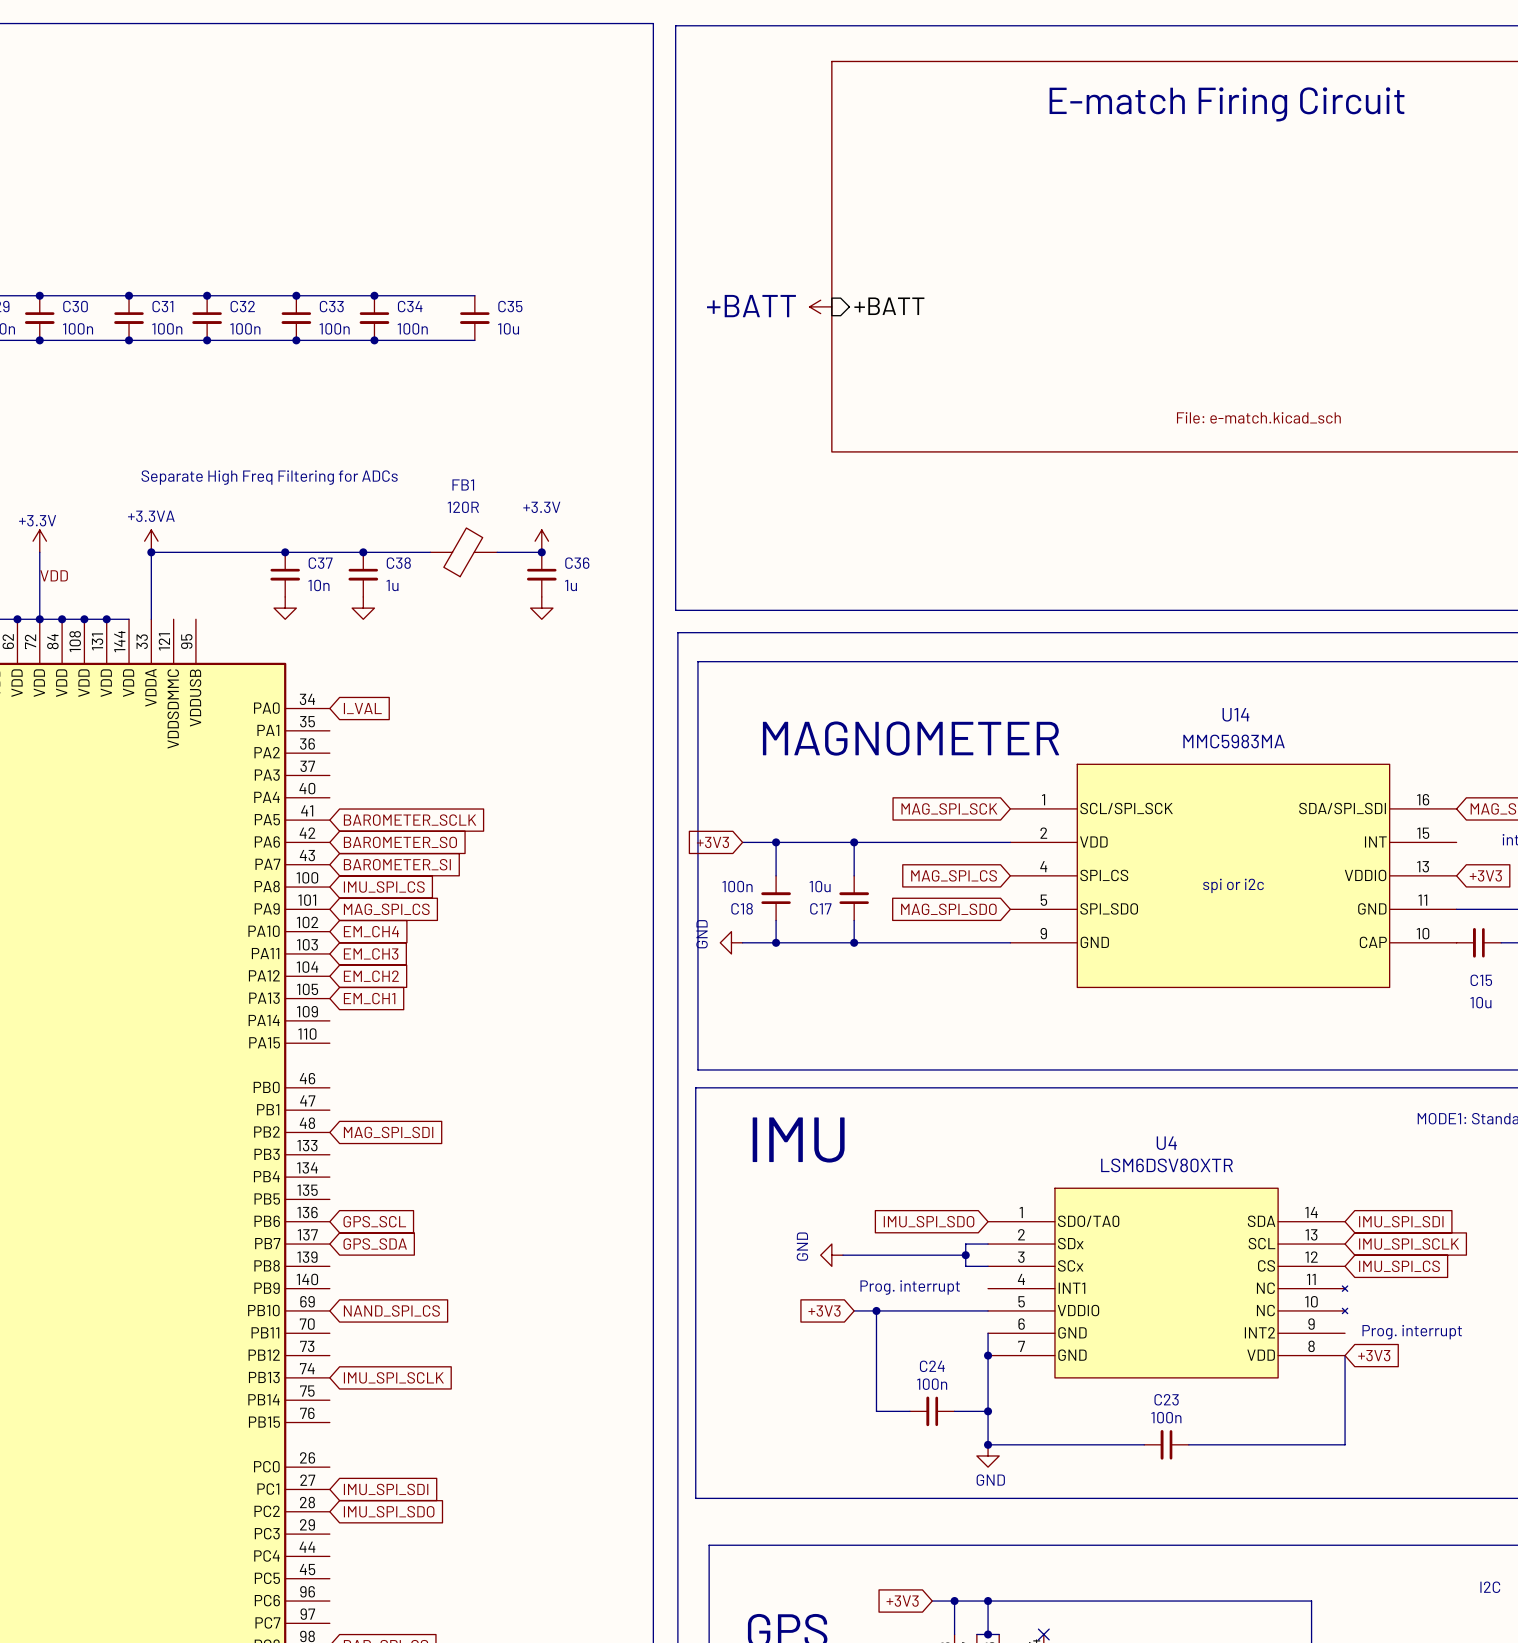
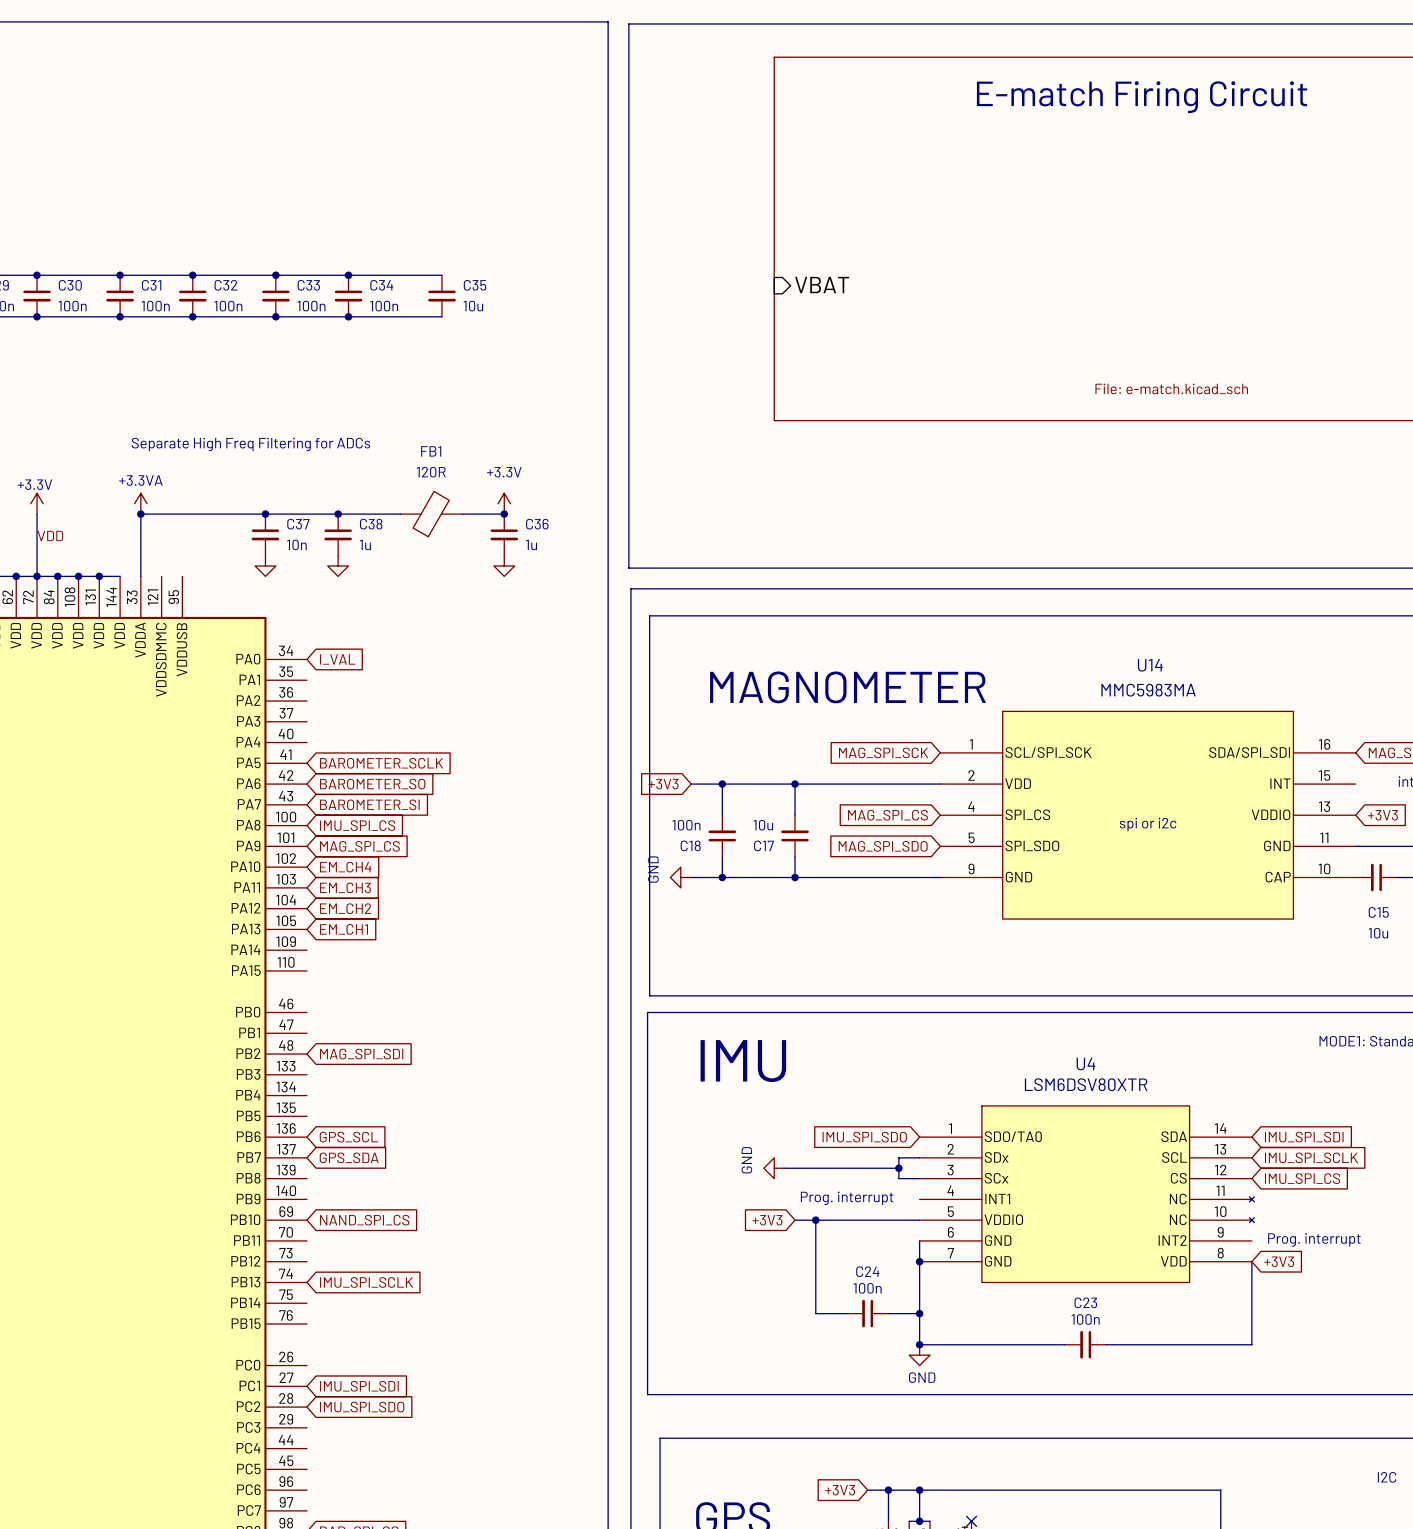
power symbol: +BATT (820, 306) -> none
sheet pin: +BATT (889, 306) -> VBAT (822, 285)

